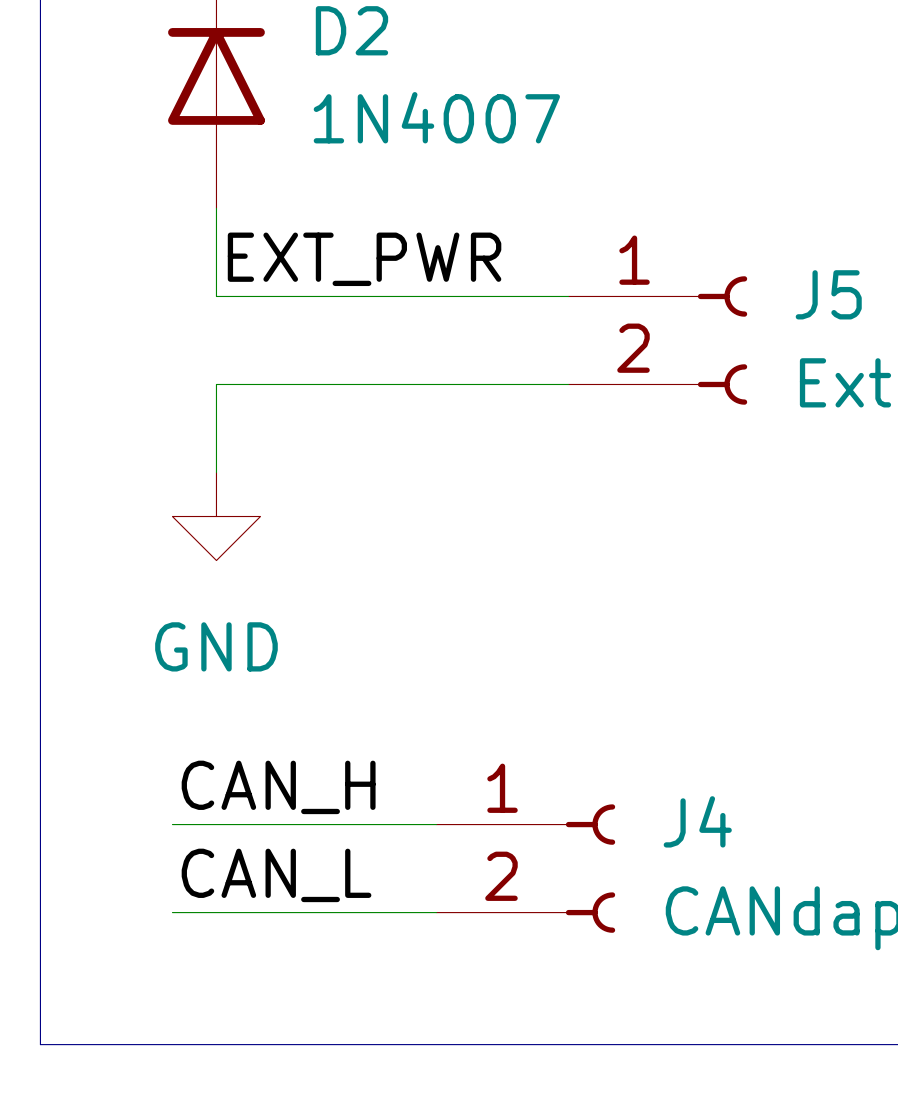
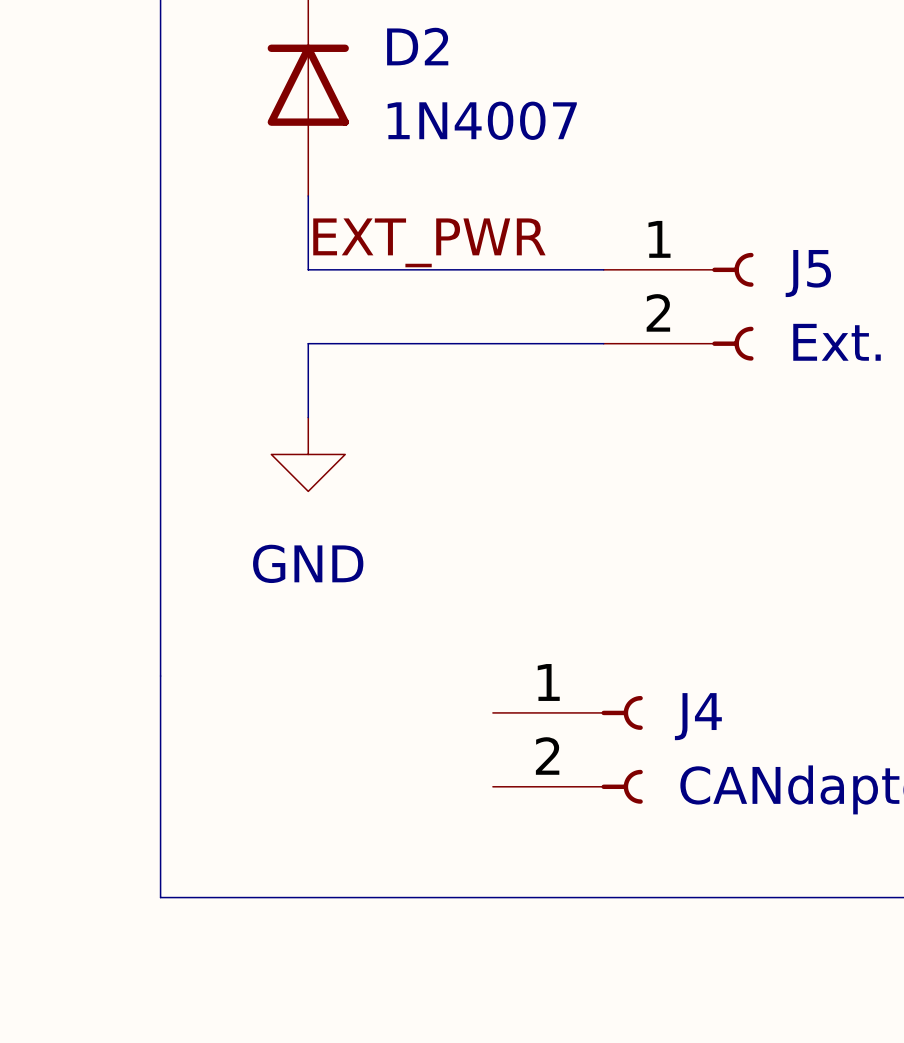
label: CAN_H (278, 787) -> none
wire: (172, 824) (436, 824) -> none
label: CAN_L (276, 875) -> none
wire: (172, 912) (436, 912) -> none

